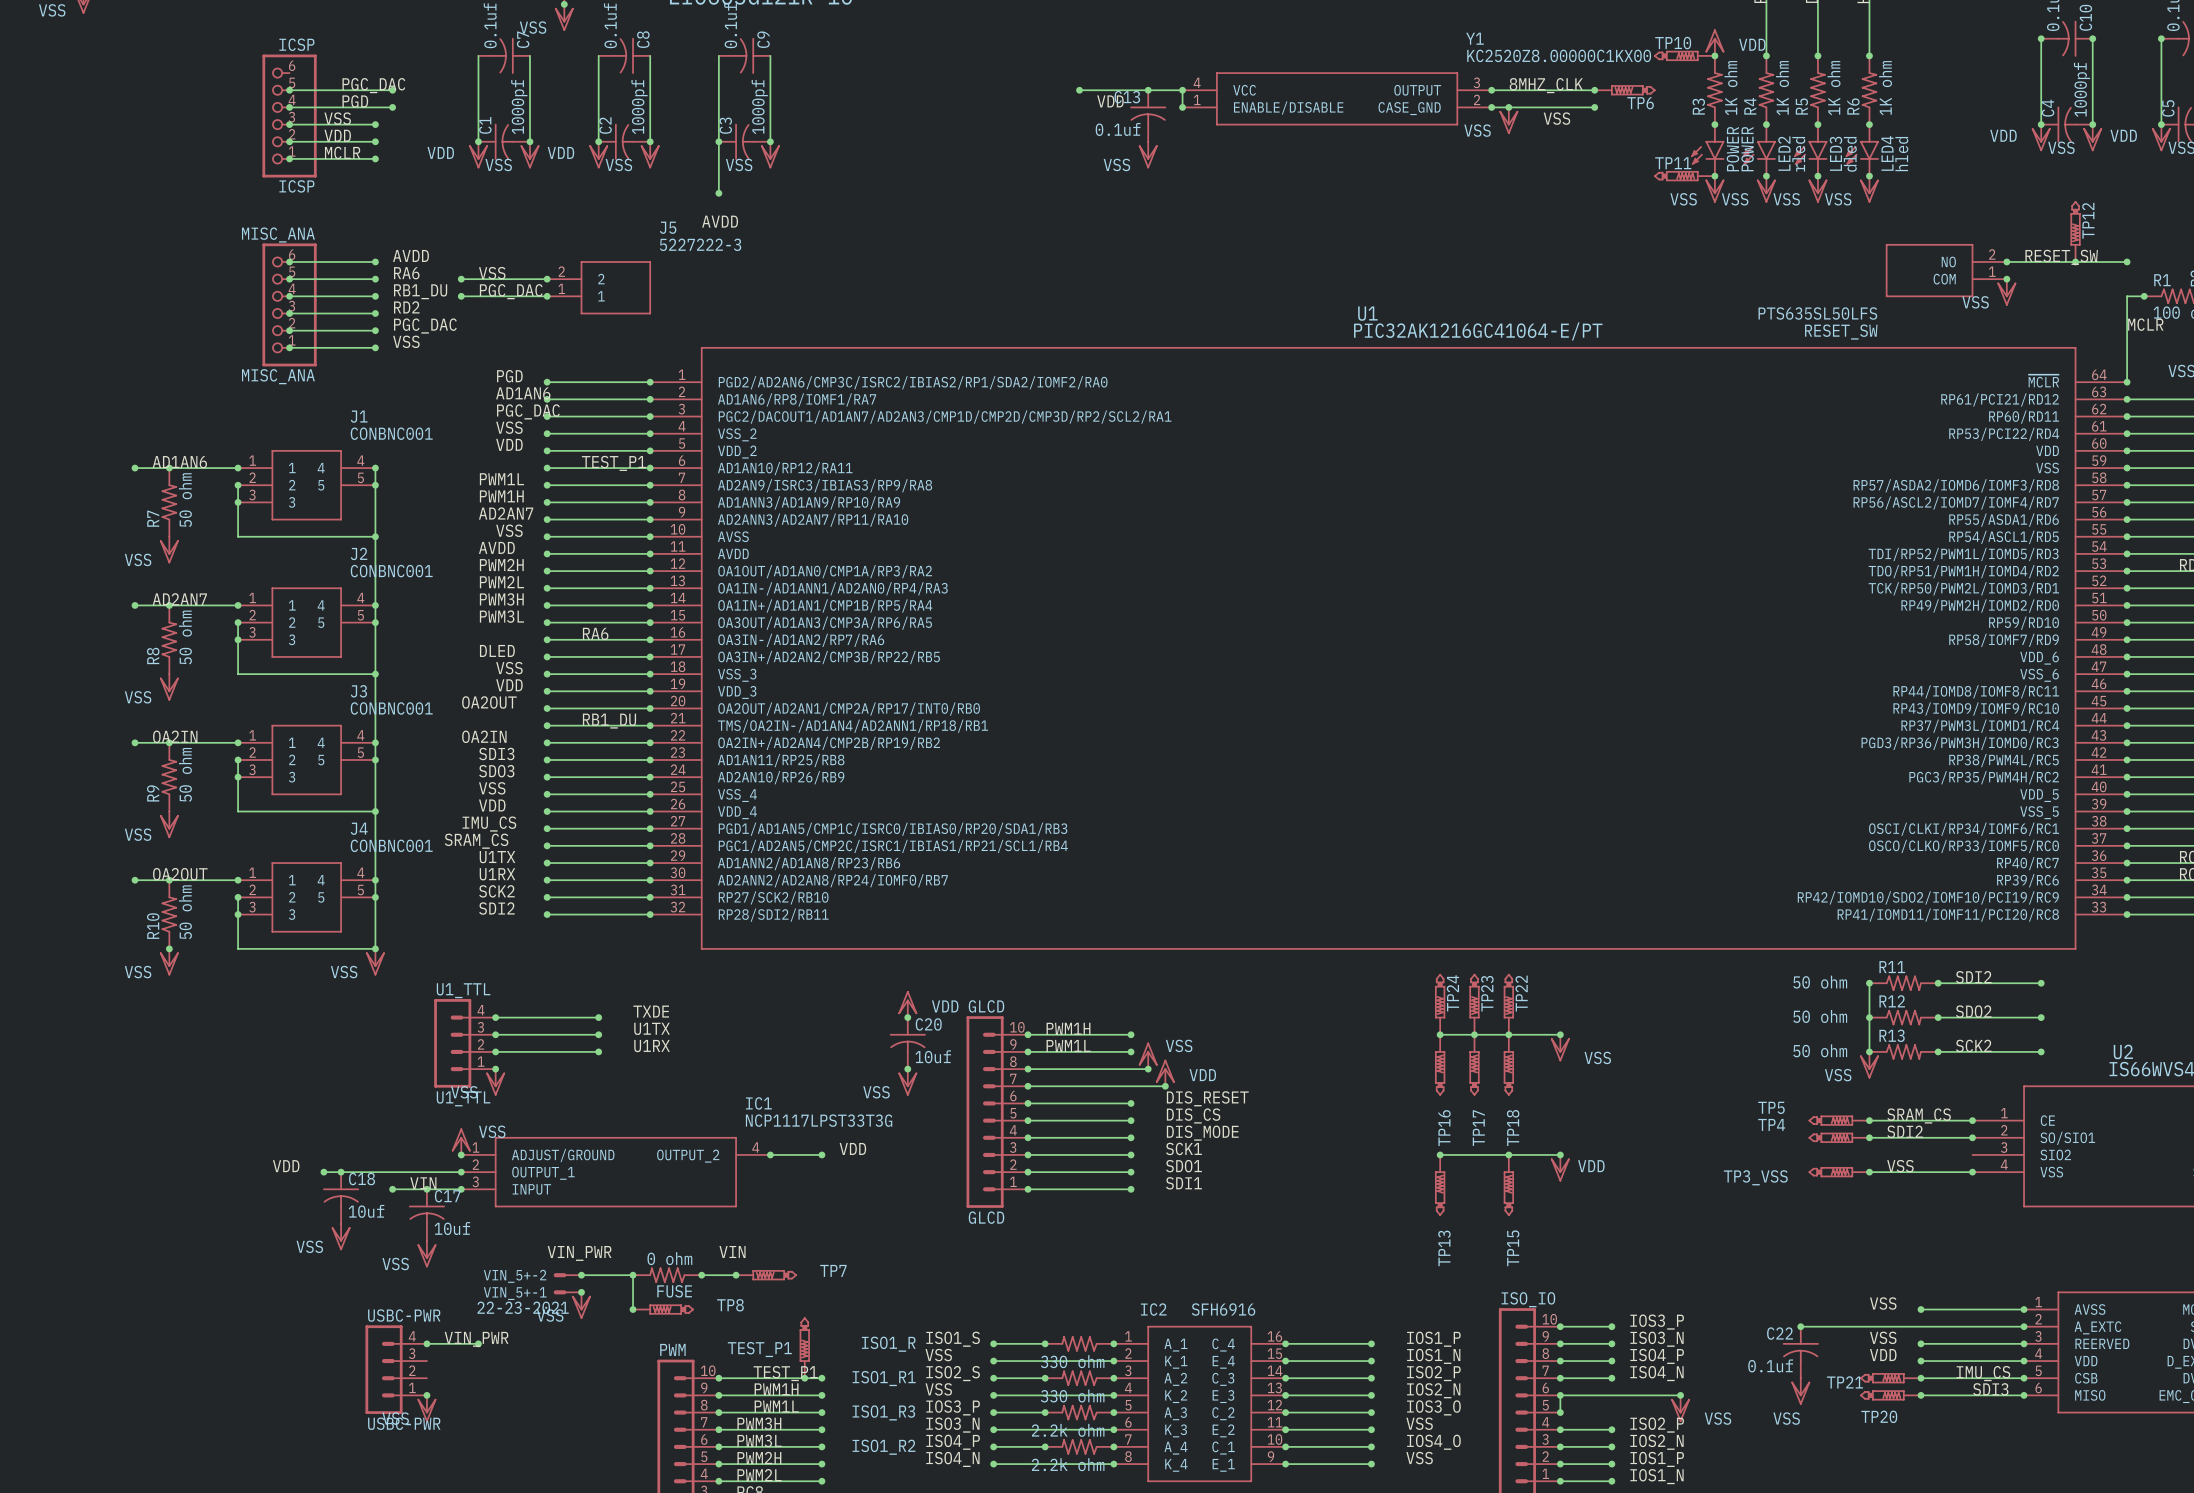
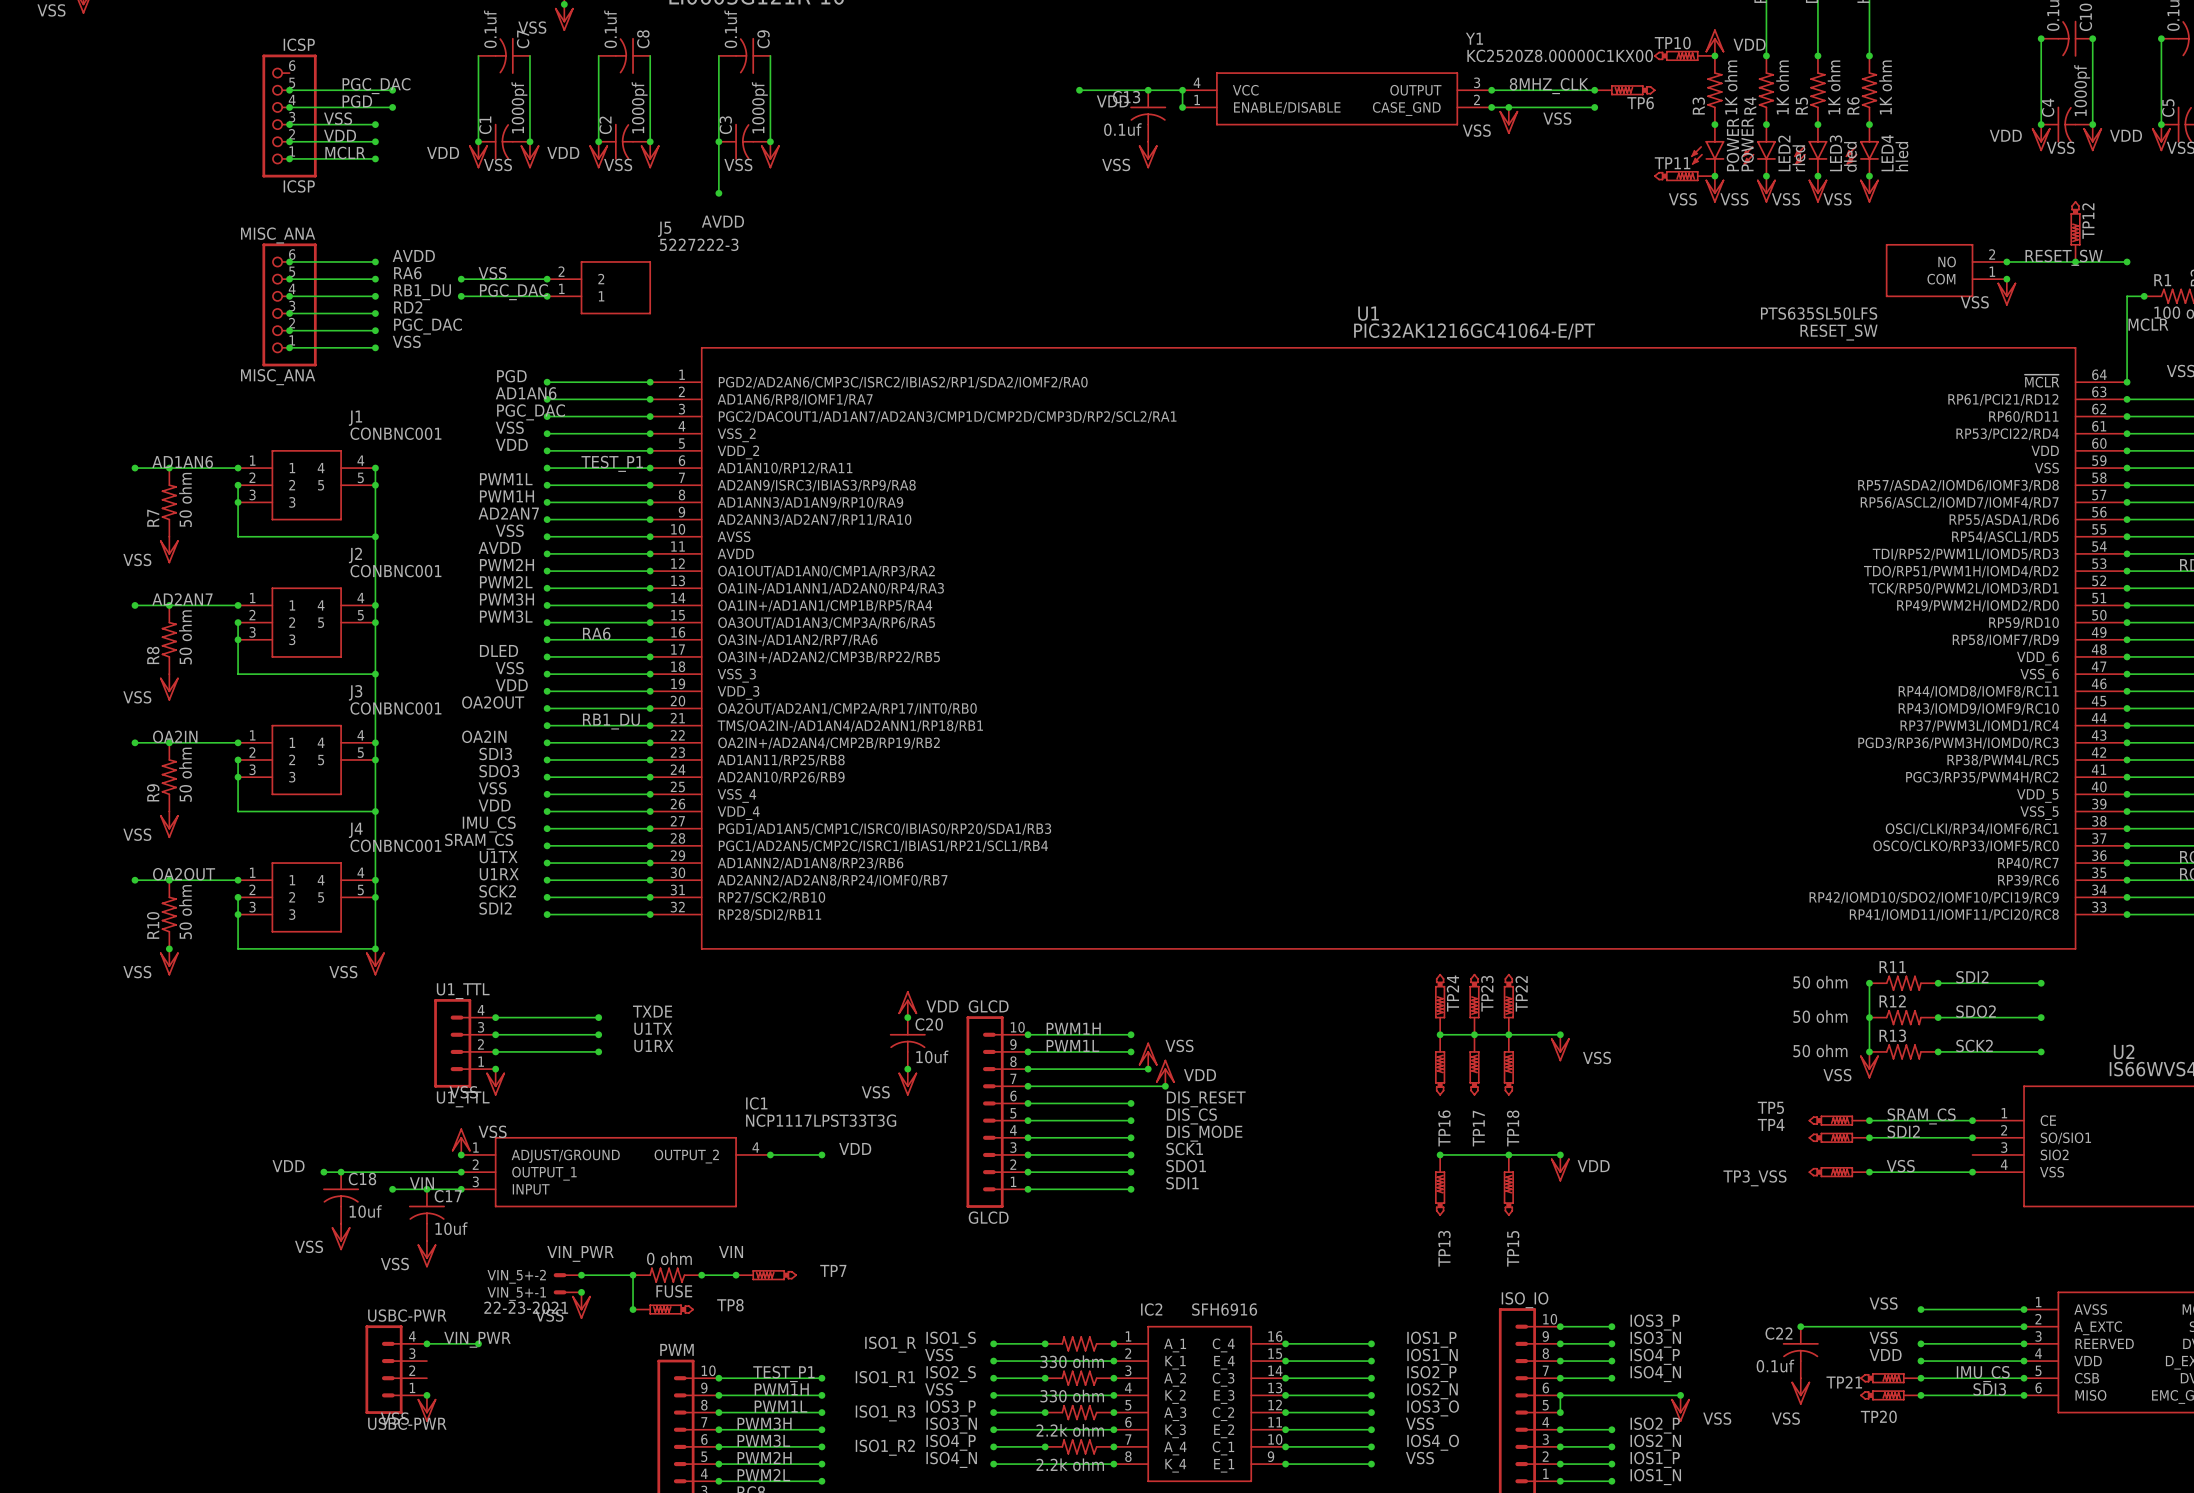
TEST_P1: (804, 1347) -> none
junction: (804, 1378) -> none

